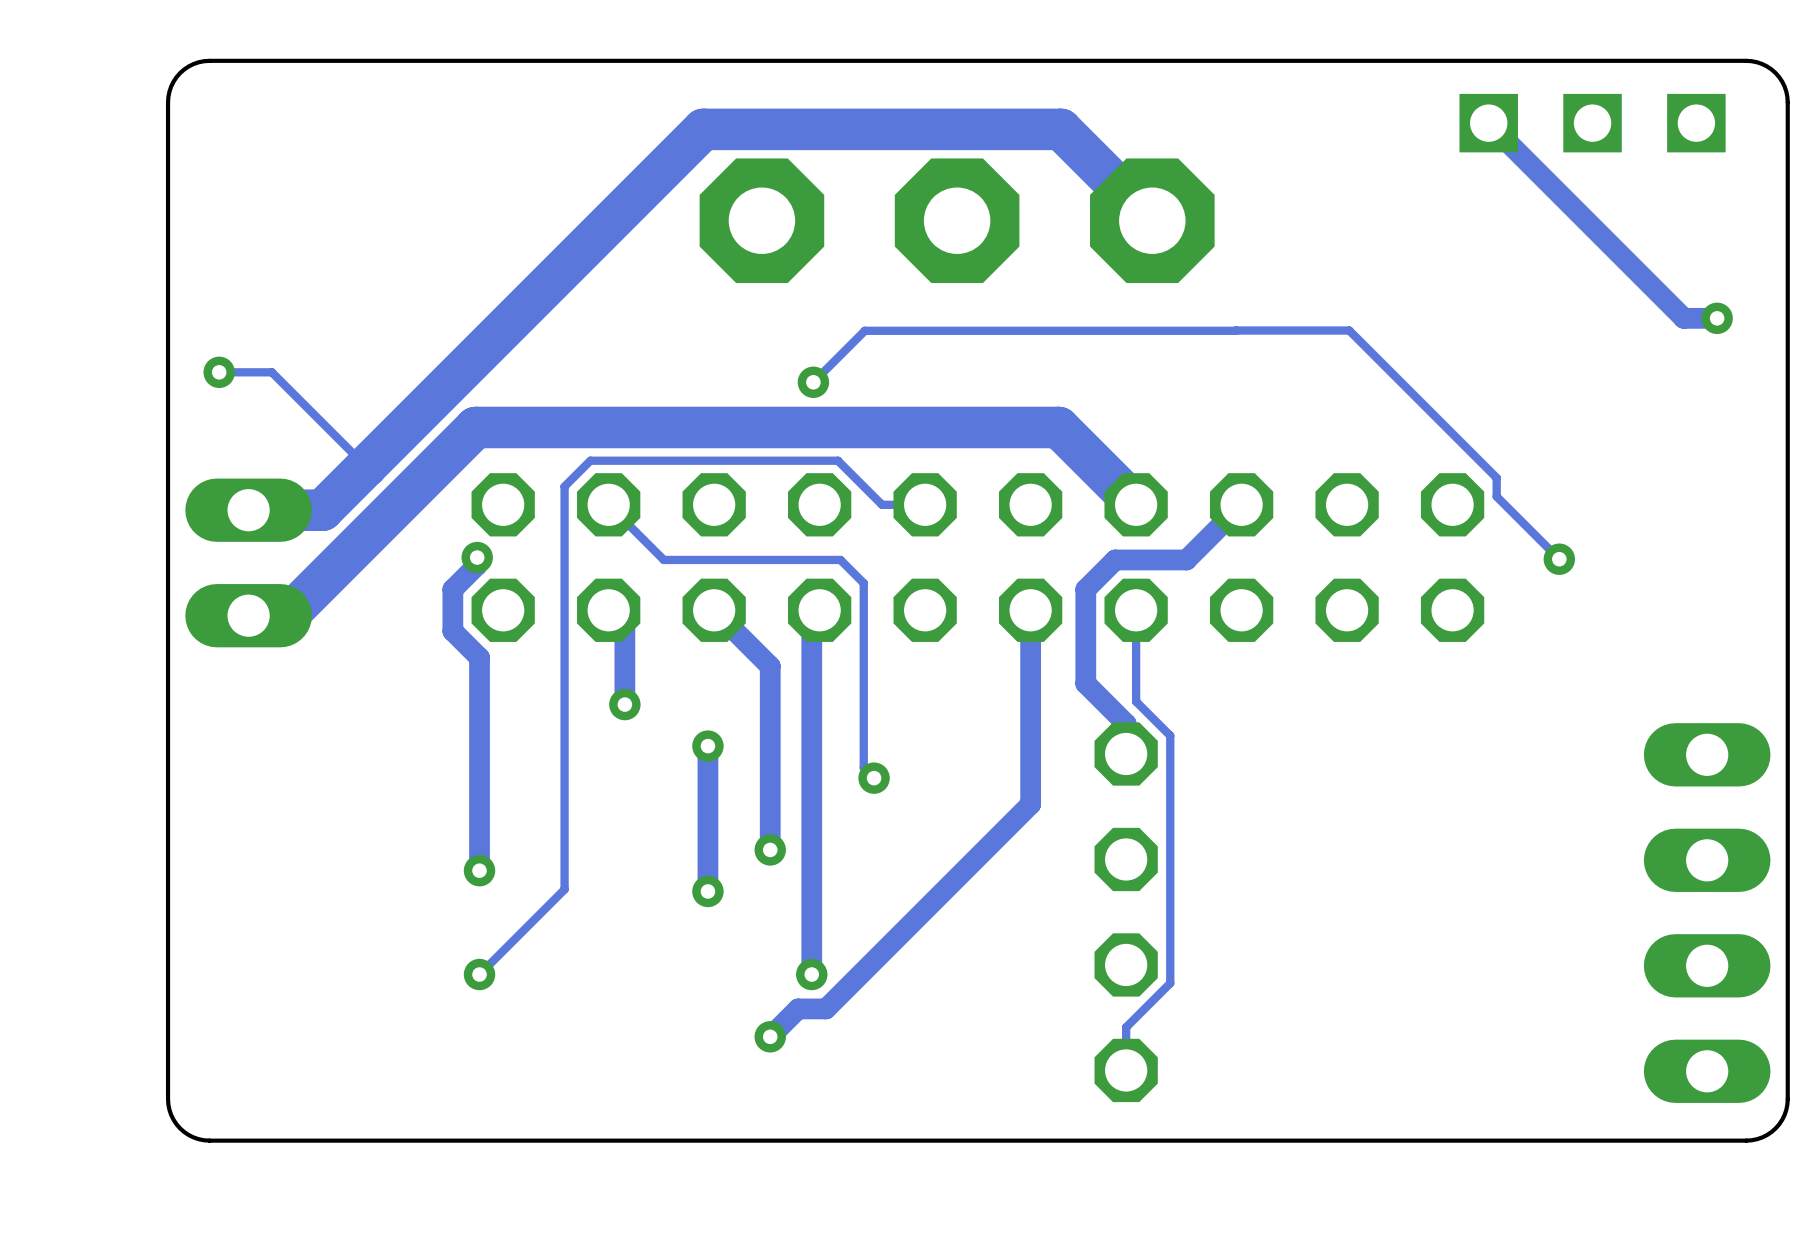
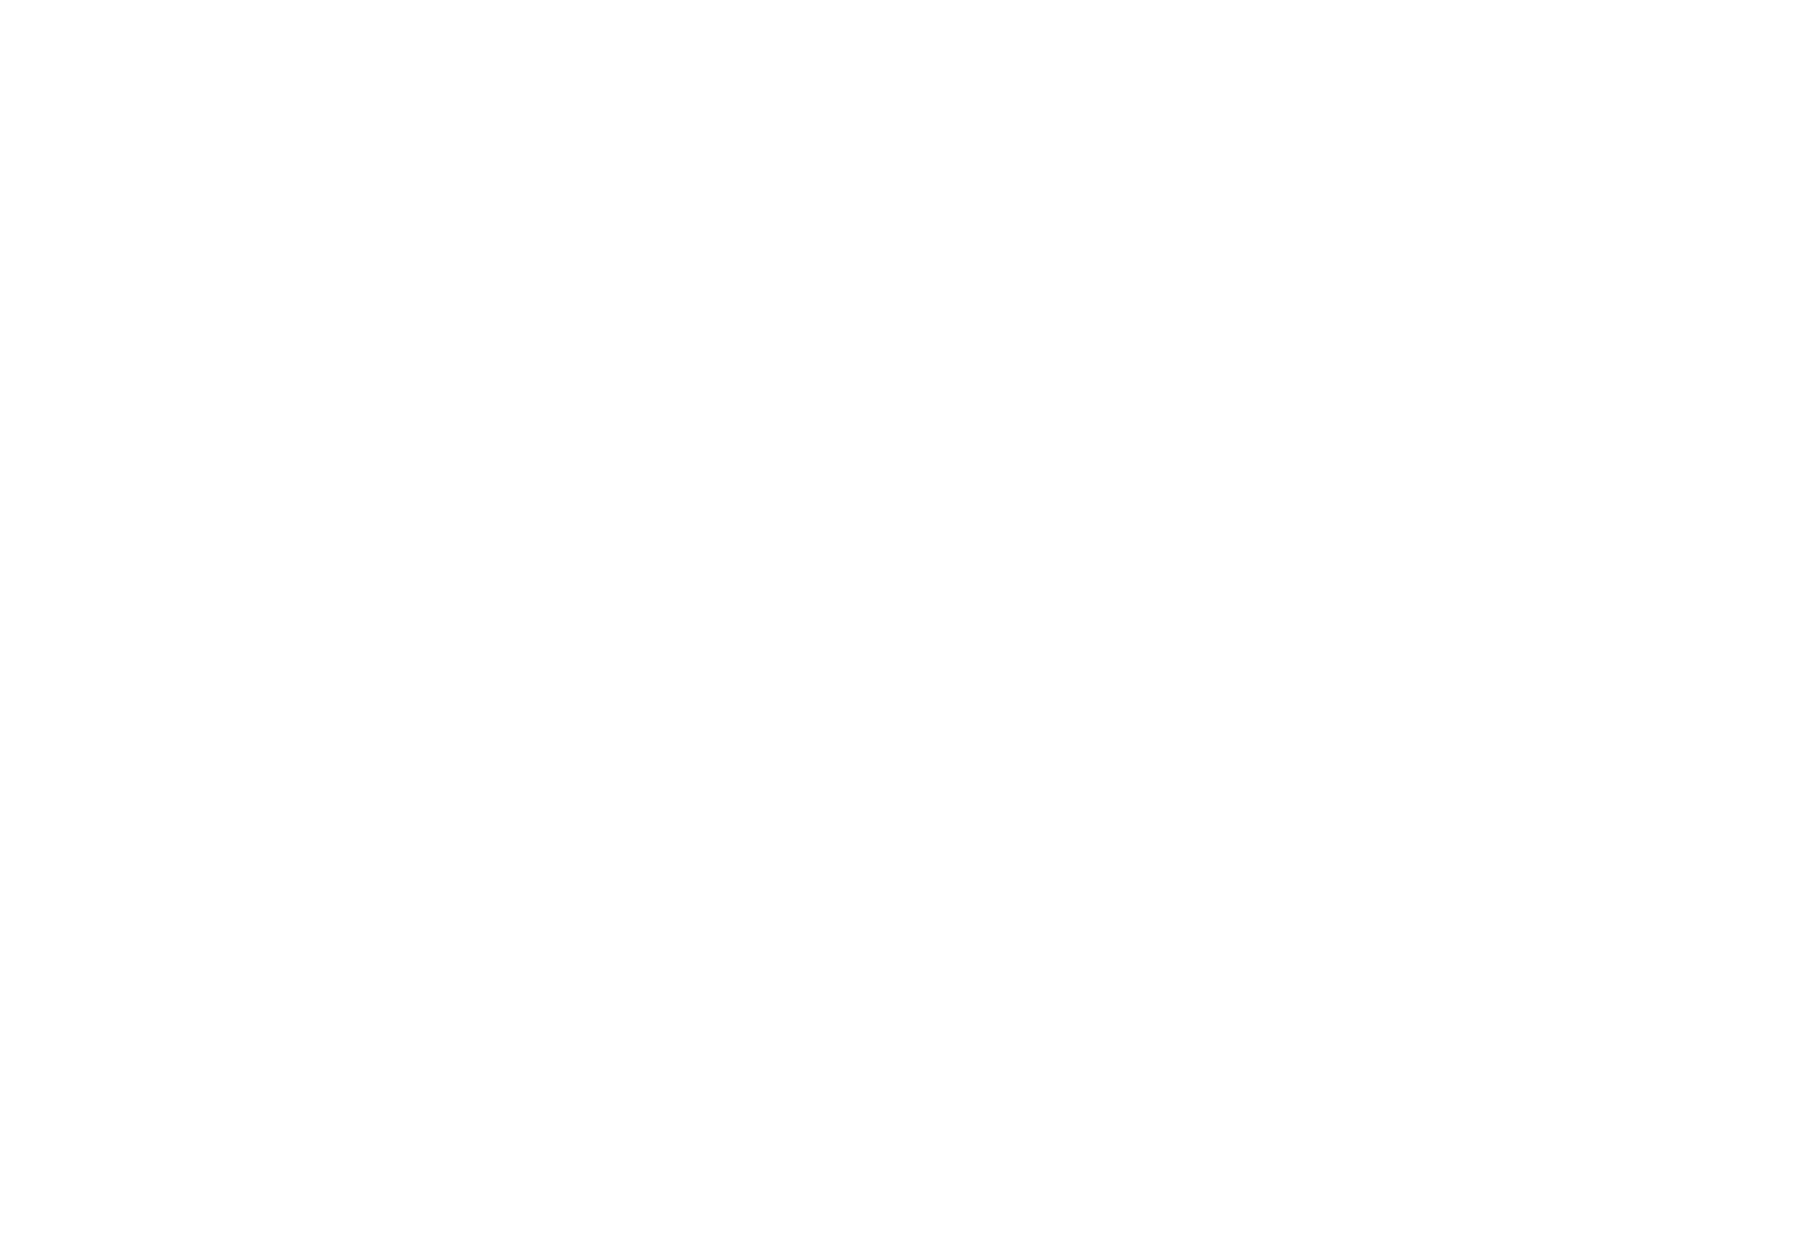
board edge: (1746, 60) (209, 60) (193, 64) (184, 69) (171, 86) (168, 102) (168, 1099) (171, 1115) (176, 1124) (193, 1137) (209, 1140) (1746, 1140) (1762, 1137) (1771, 1132) (1784, 1115) (1787, 1099) (1787, 102) (1784, 86) (1775, 73) (1762, 64) (1746, 60) -> none
track: (1488, 123) (1683, 318) (1717, 318) -> none
part: (1592, 123) -> none
part: (957, 220) -> none
track: (1152, 220) (1060, 129) (703, 129) (322, 510) (248, 510) -> none
via: (1717, 318) -> none
track: (1235, 330) (864, 330) (813, 382) -> none
track: (1236, 330) (1349, 330) (1496, 477) (1496, 496) (1559, 559) -> none
track: (219, 372) (271, 372) (366, 466) -> none
via: (219, 372) -> none
via: (813, 382) -> none
track: (608, 504) (663, 559) (840, 559) (863, 583) (863, 767) (874, 778) -> none
track: (925, 504) (882, 504) (837, 460) (590, 460) (564, 486) (564, 889) (479, 974) -> none
track: (1136, 504) (1058, 427) (475, 427) (287, 615) (248, 615) -> none
track: (1241, 504) (1186, 559) (1115, 559) (1085, 589) (1085, 683) (1126, 723) (1126, 753) -> none
track: (477, 557) (477, 565) (452, 589) (452, 631) (479, 657) (479, 870) -> none
via: (477, 557) -> none
part: (977, 557) -> none
via: (1559, 559) -> none
part: (248, 562) -> none
track: (608, 610) (624, 626) (624, 704) -> none
track: (714, 610) (770, 666) (770, 849) -> none
track: (819, 610) (811, 618) (811, 974) -> none
track: (1030, 610) (1030, 804) (826, 1008) (798, 1008) (770, 1036) -> none
track: (1136, 610) (1136, 701) (1170, 735) (1170, 983) (1126, 1027) (1126, 1070) -> none
via: (624, 704) -> none
track: (707, 746) (707, 891) -> none
via: (707, 746) -> none
via: (874, 778) -> none
via: (770, 849) -> none
via: (479, 870) -> none
via: (707, 891) -> none
part: (1126, 912) -> none
part: (1707, 913) -> none
via: (479, 974) -> none
via: (811, 974) -> none
via: (770, 1036) -> none

